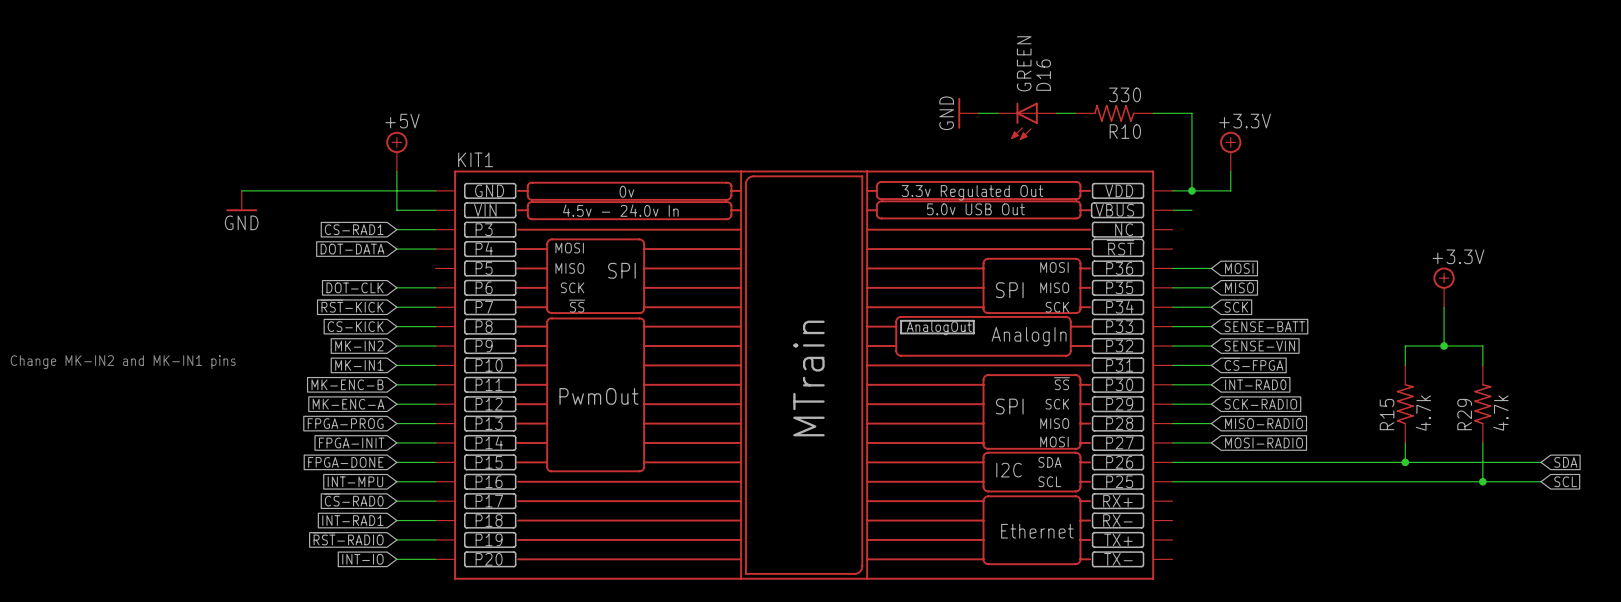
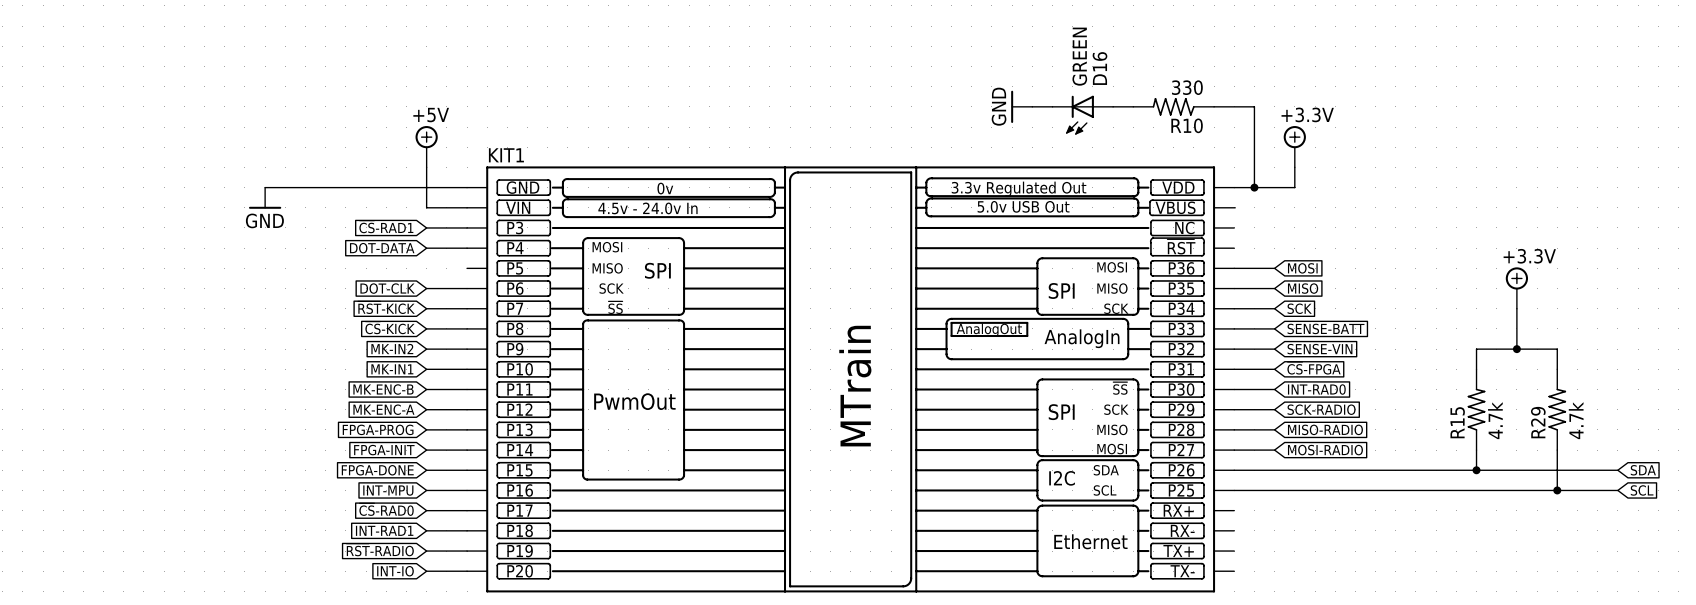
wire: (1173, 210) (1191, 210) -> none
text: Change MK-IN2 and MK-IN1 pins (123, 362) -> none

